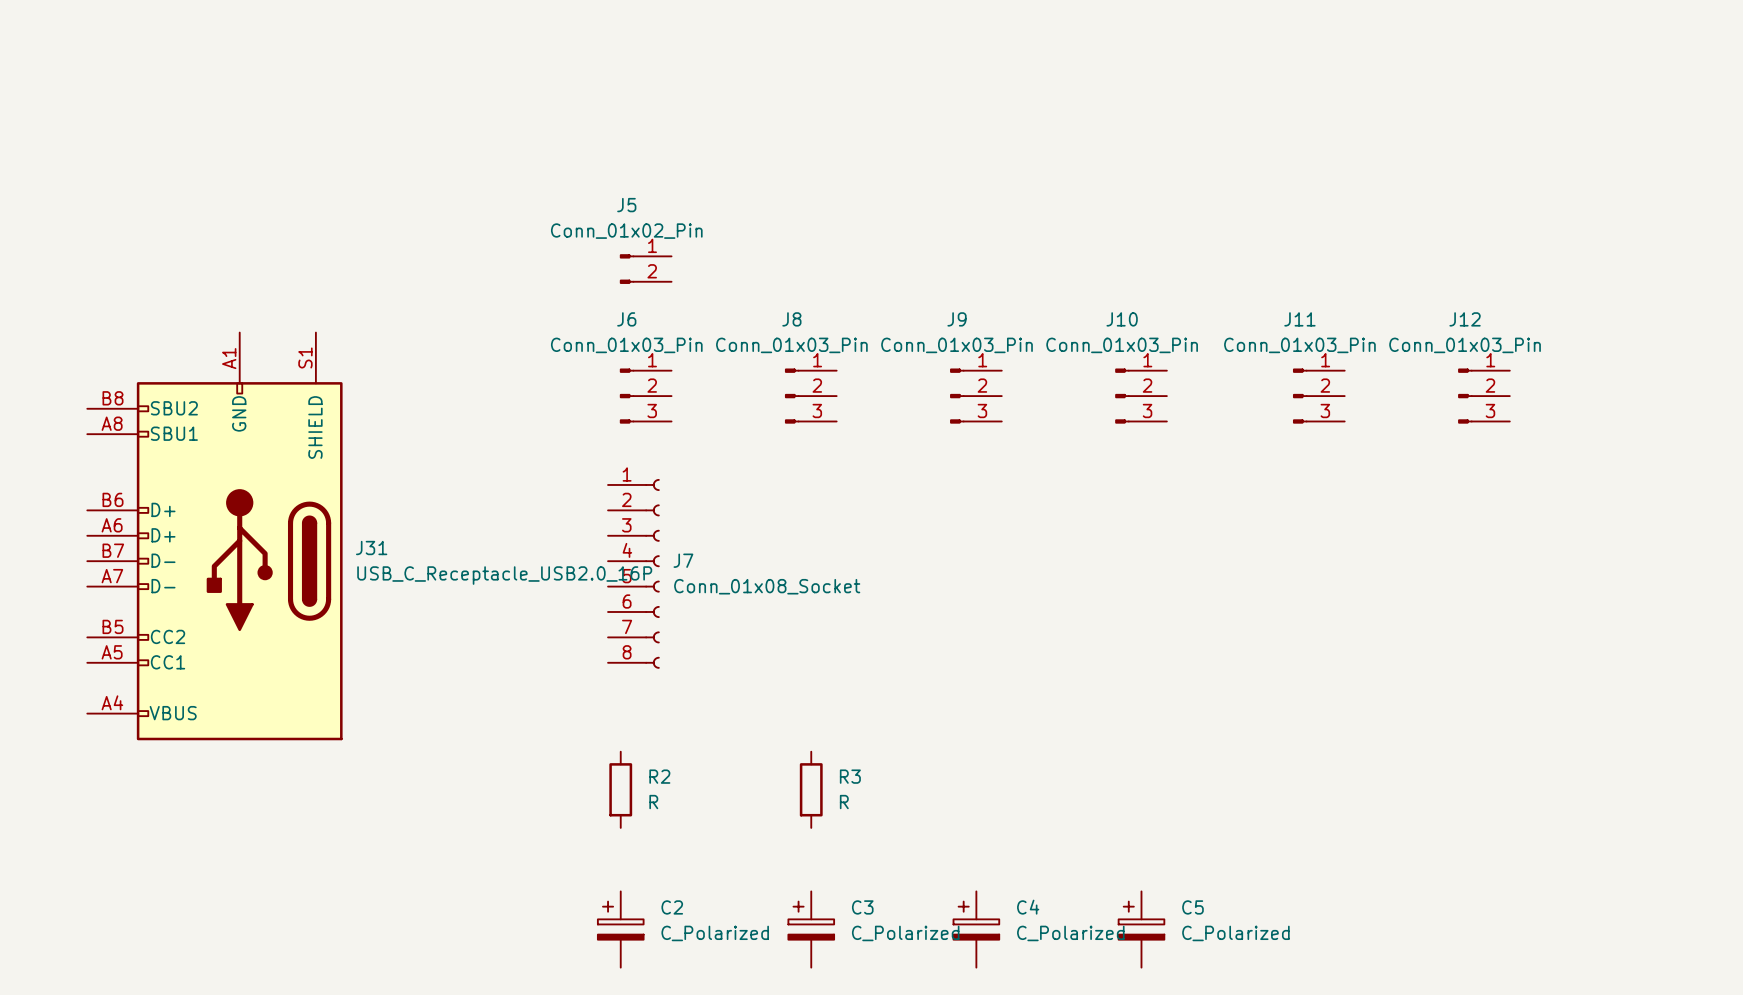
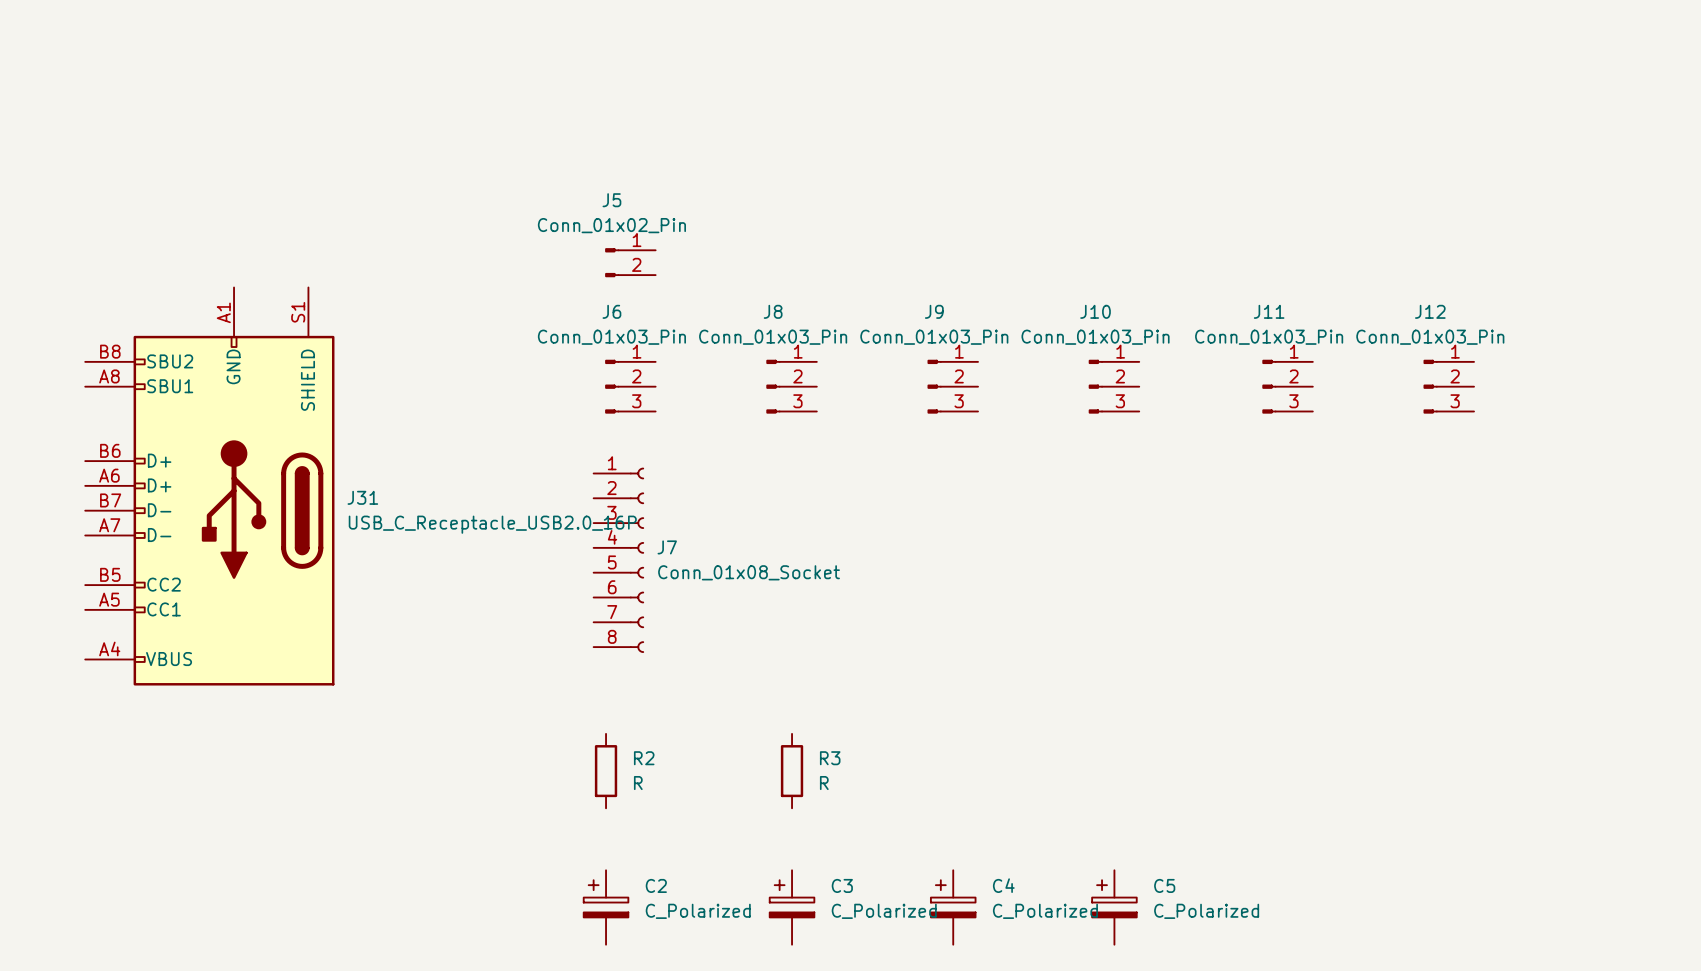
J31 position: (214, 536) -> (209, 486)

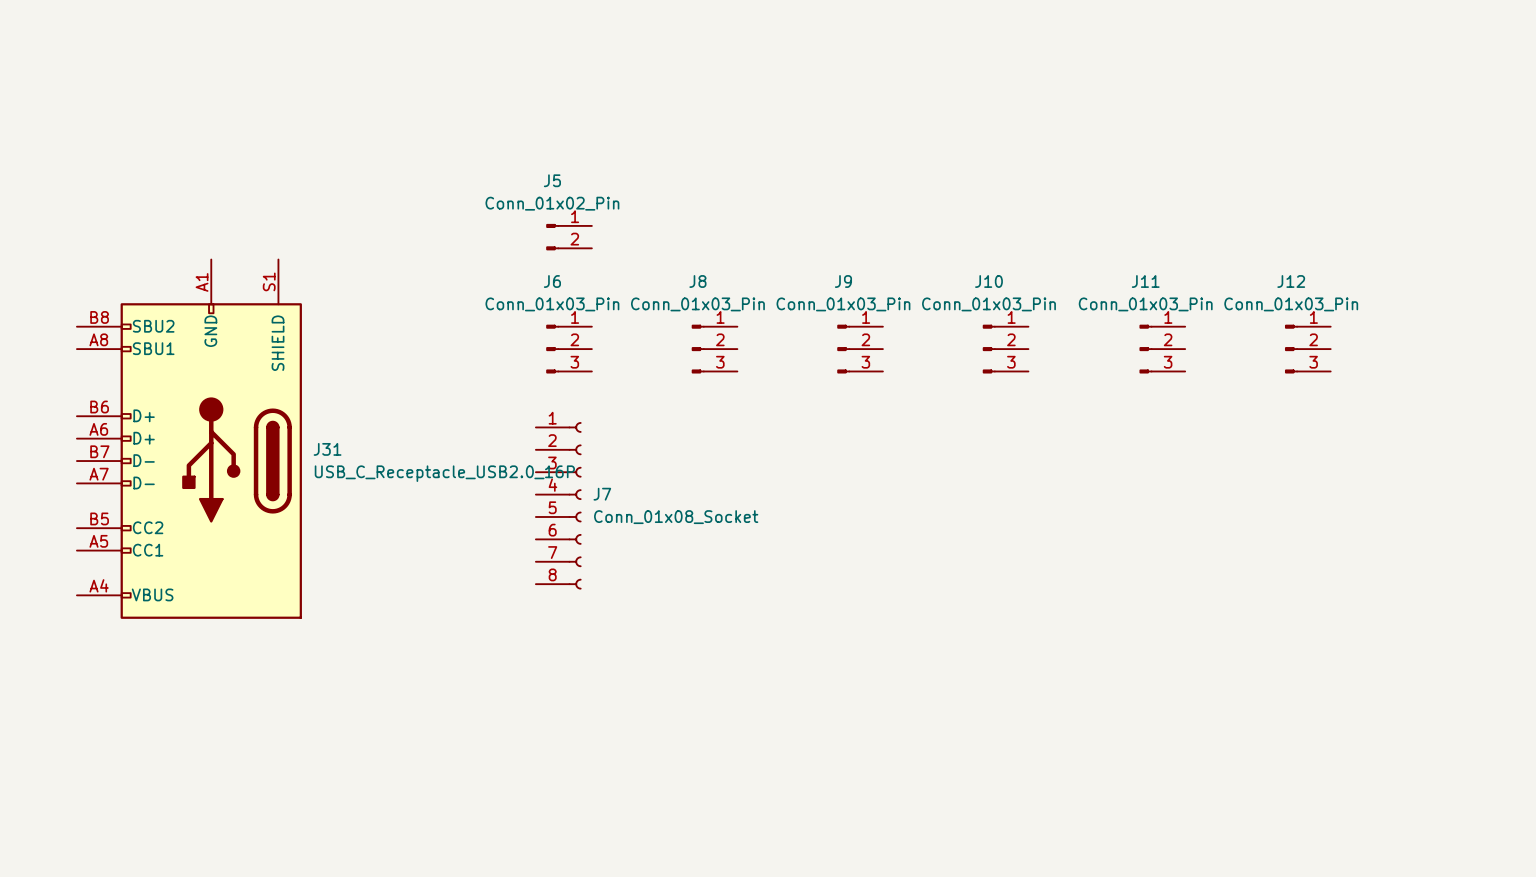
R2: R (606, 771) -> none
R3: R (792, 771) -> none
C2: C_Polarized (606, 907) -> none
C3: C_Polarized (792, 907) -> none
C4: C_Polarized (953, 907) -> none
C5: C_Polarized (1114, 907) -> none

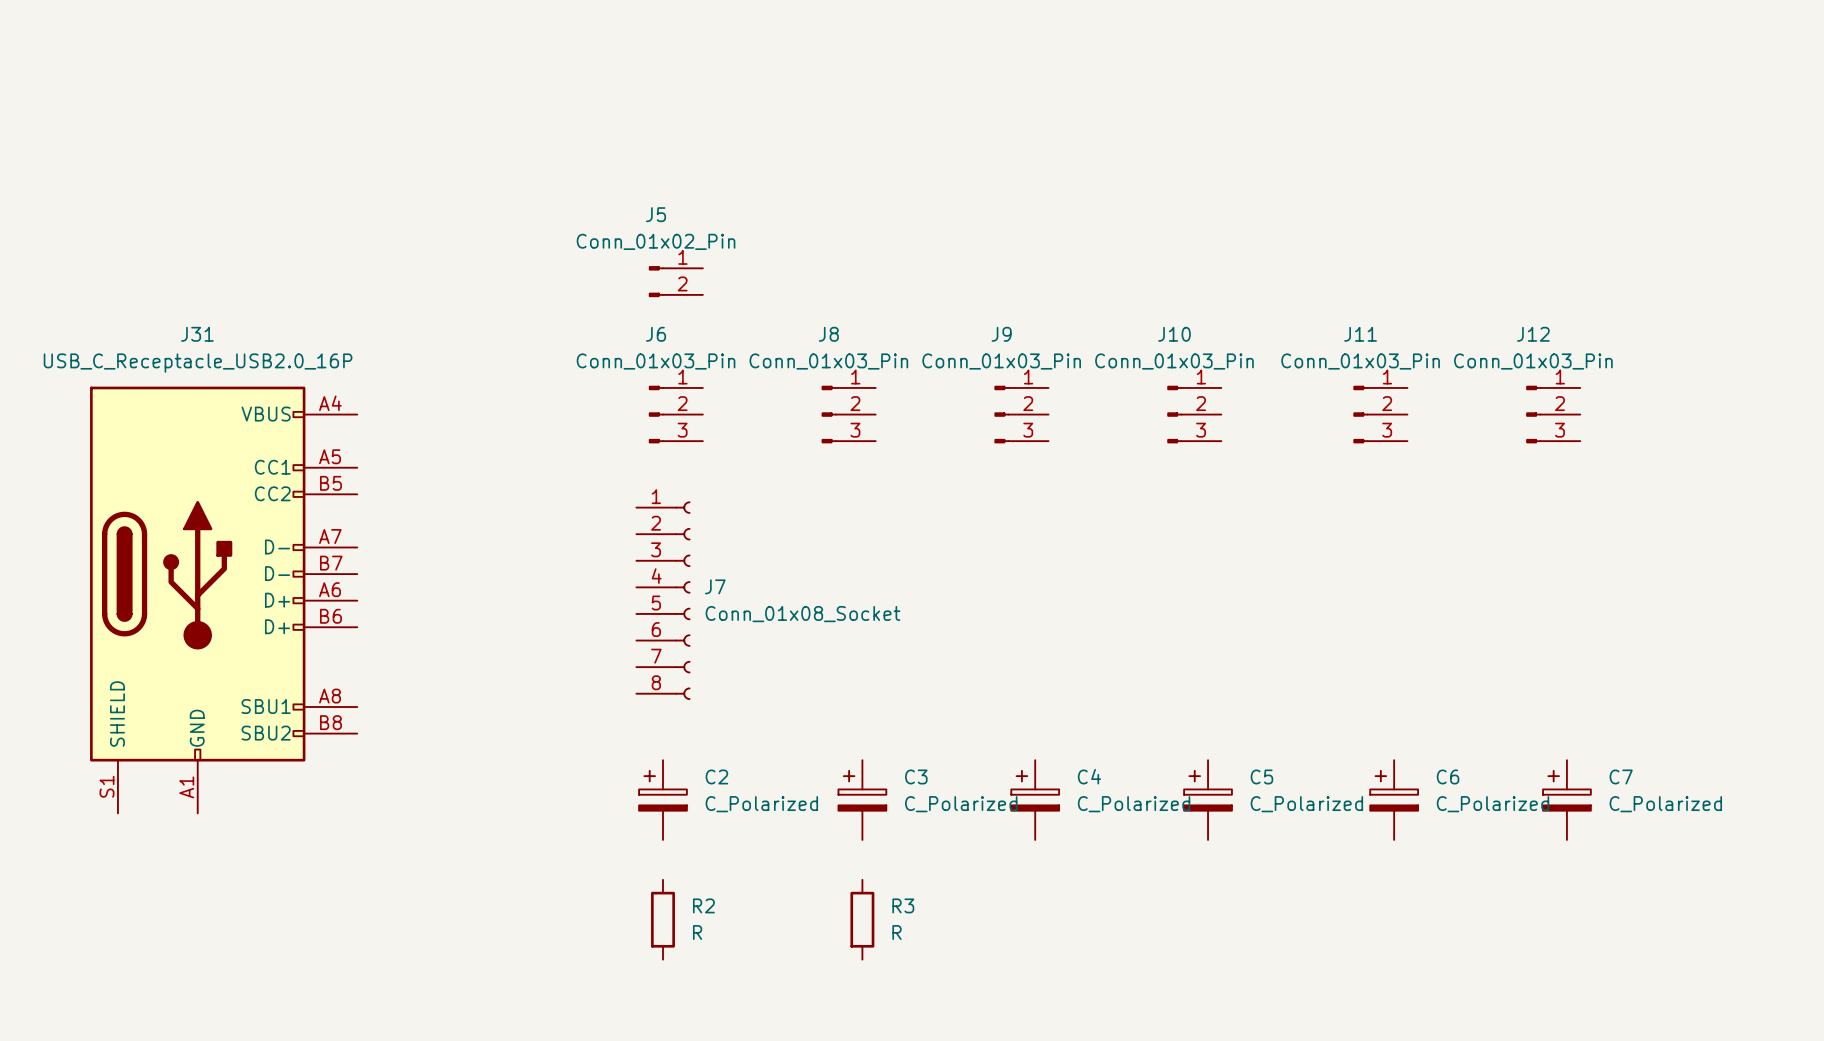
J31 name position: J31 (327, 449) -> J31 (197, 334)
J31 rotation: 0° (211, 461) -> 180° (197, 574)
J31 value position: USB_C_Receptacle_USB2.0_16P (444, 473) -> USB_C_Receptacle_USB2.0_16P (198, 363)
C2: none -> C_Polarized (662, 800)
C3: none -> C_Polarized (862, 800)
C4: none -> C_Polarized (1035, 800)
C5: none -> C_Polarized (1208, 800)
C6: none -> C_Polarized (1394, 800)
C7: none -> C_Polarized (1566, 800)
R2: none -> R (662, 919)
R3: none -> R (862, 919)

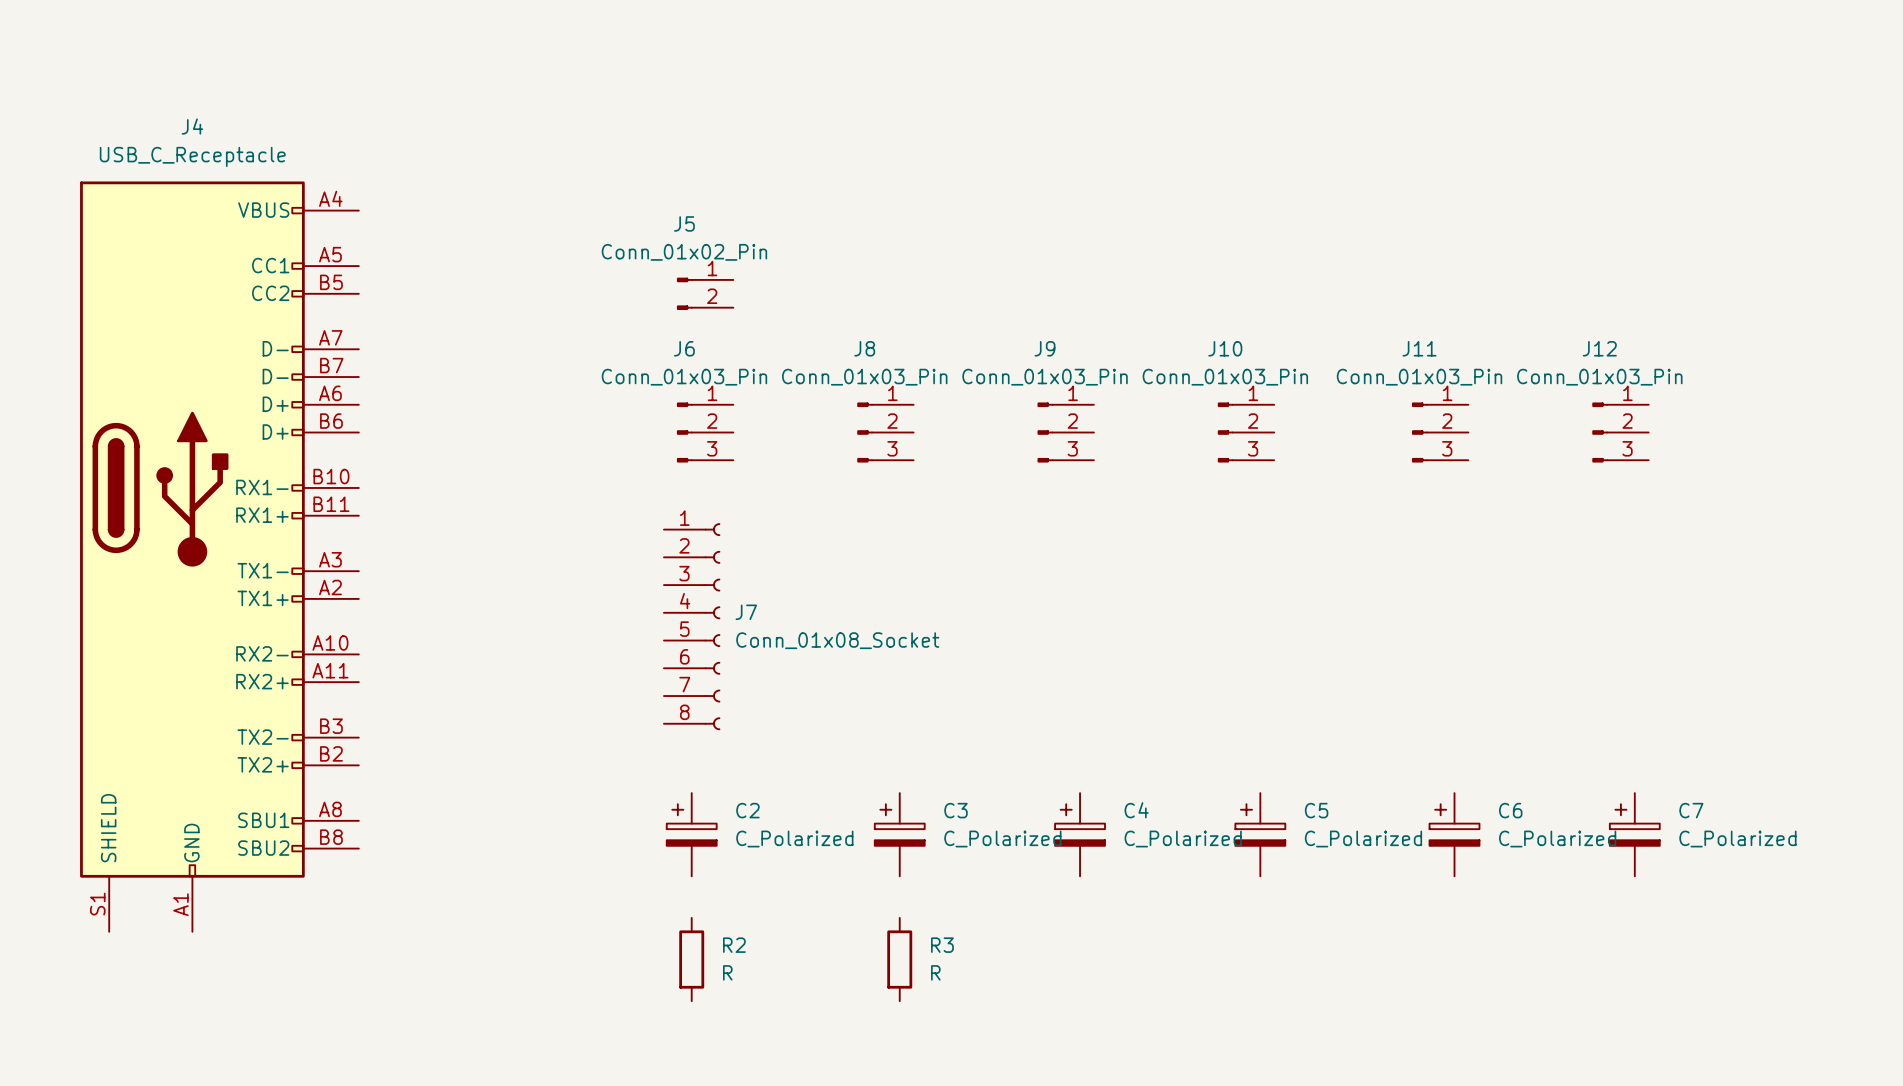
J4: none -> USB_C_Receptacle (219, 556)
J31: USB_C_Receptacle_USB2.0_16P (223, 600) -> none

